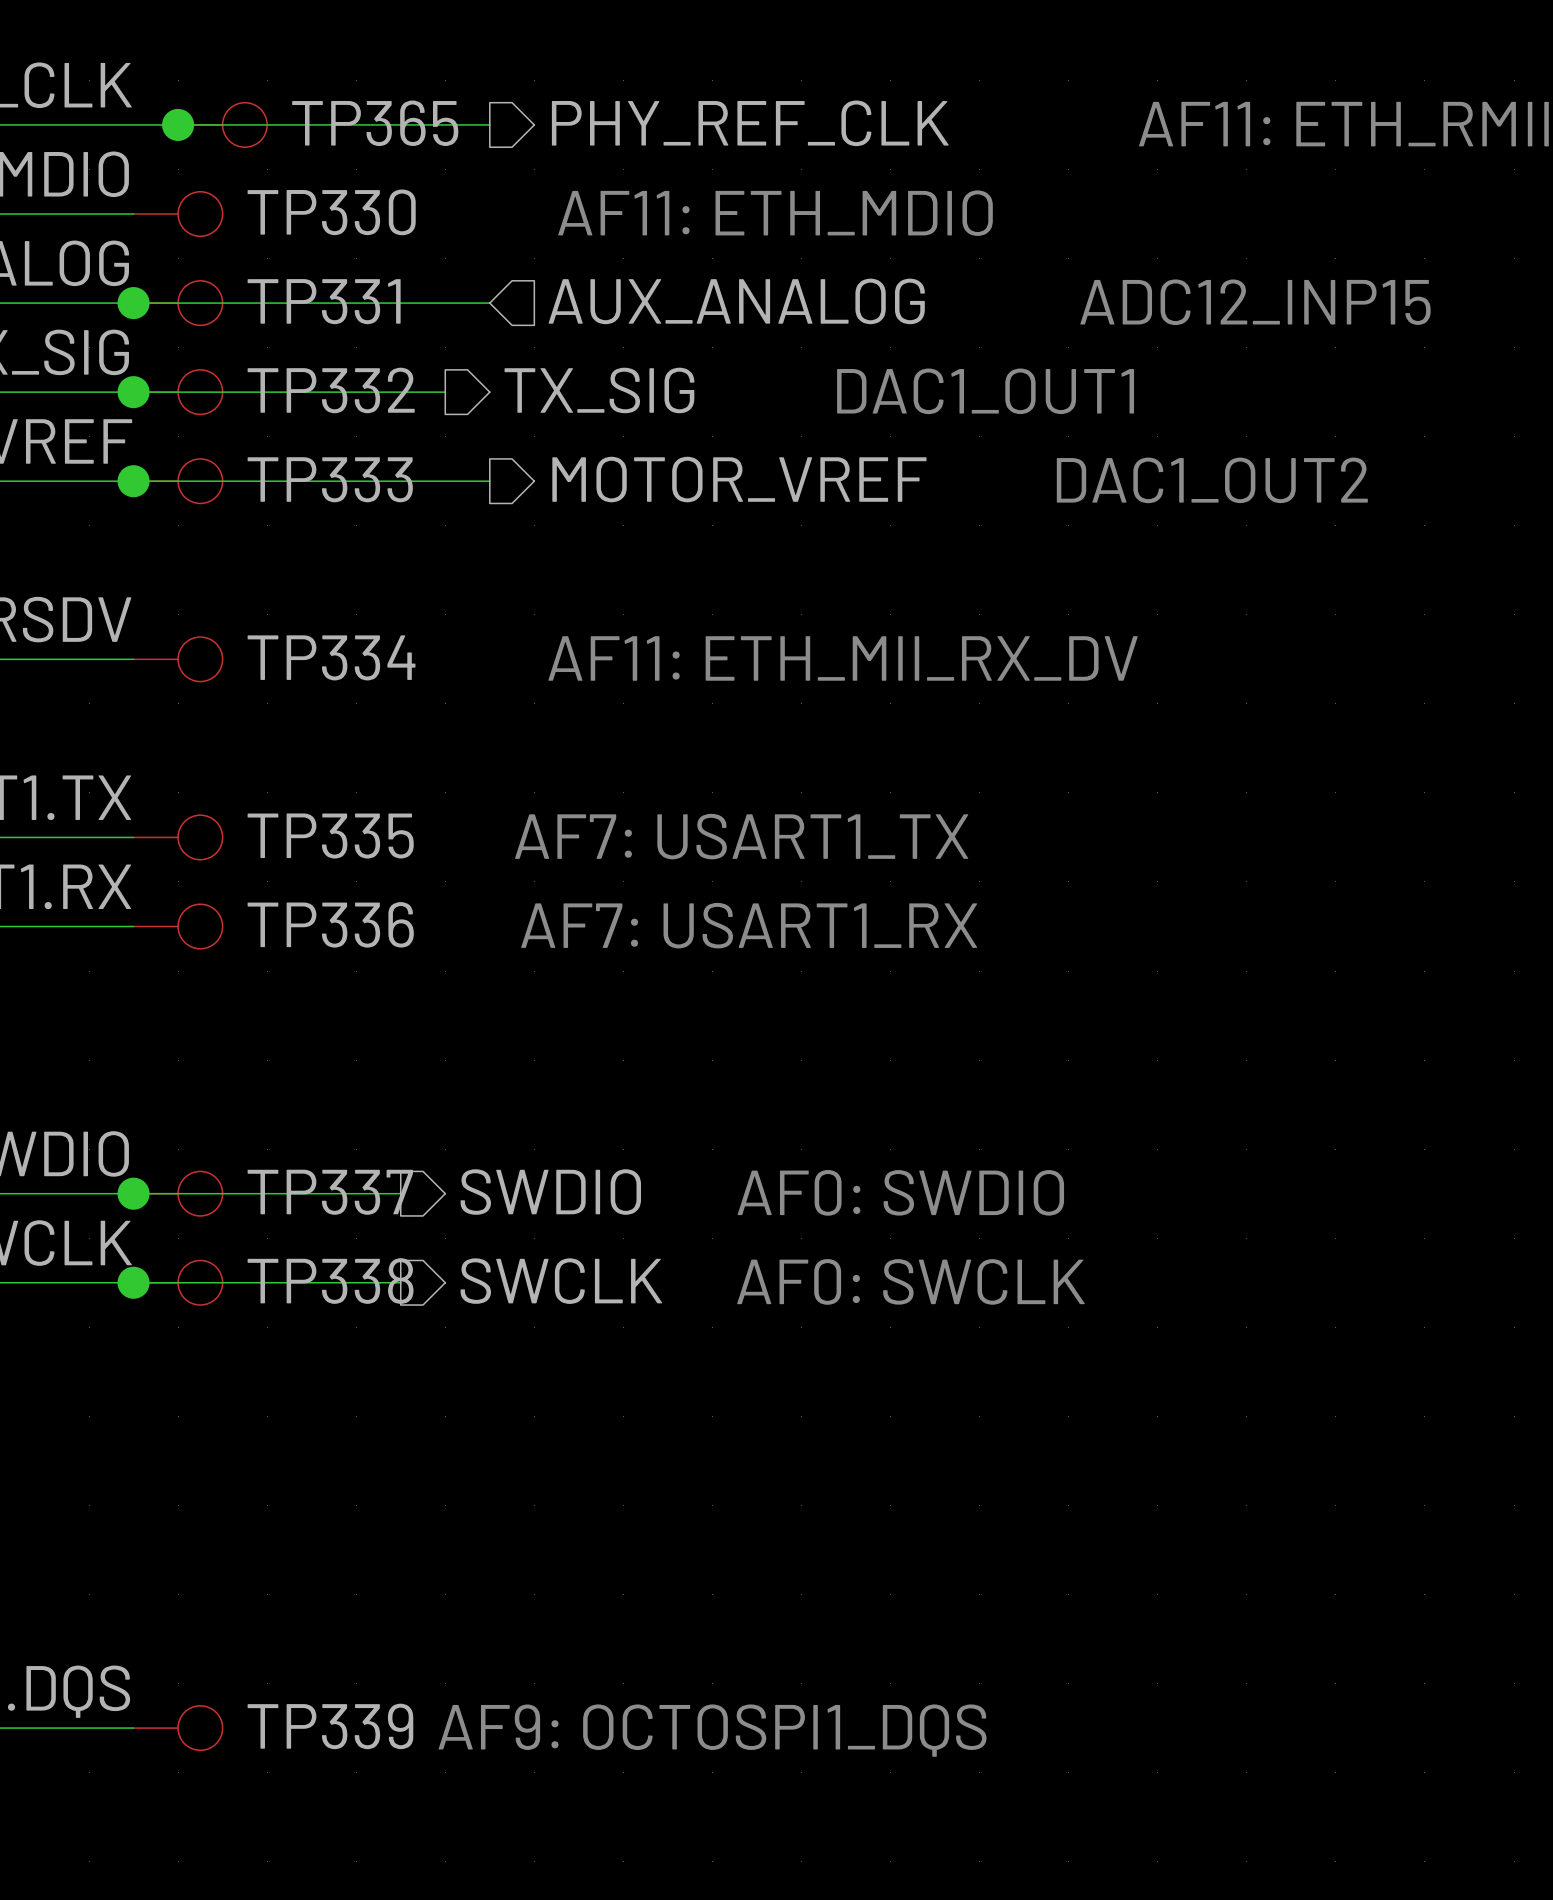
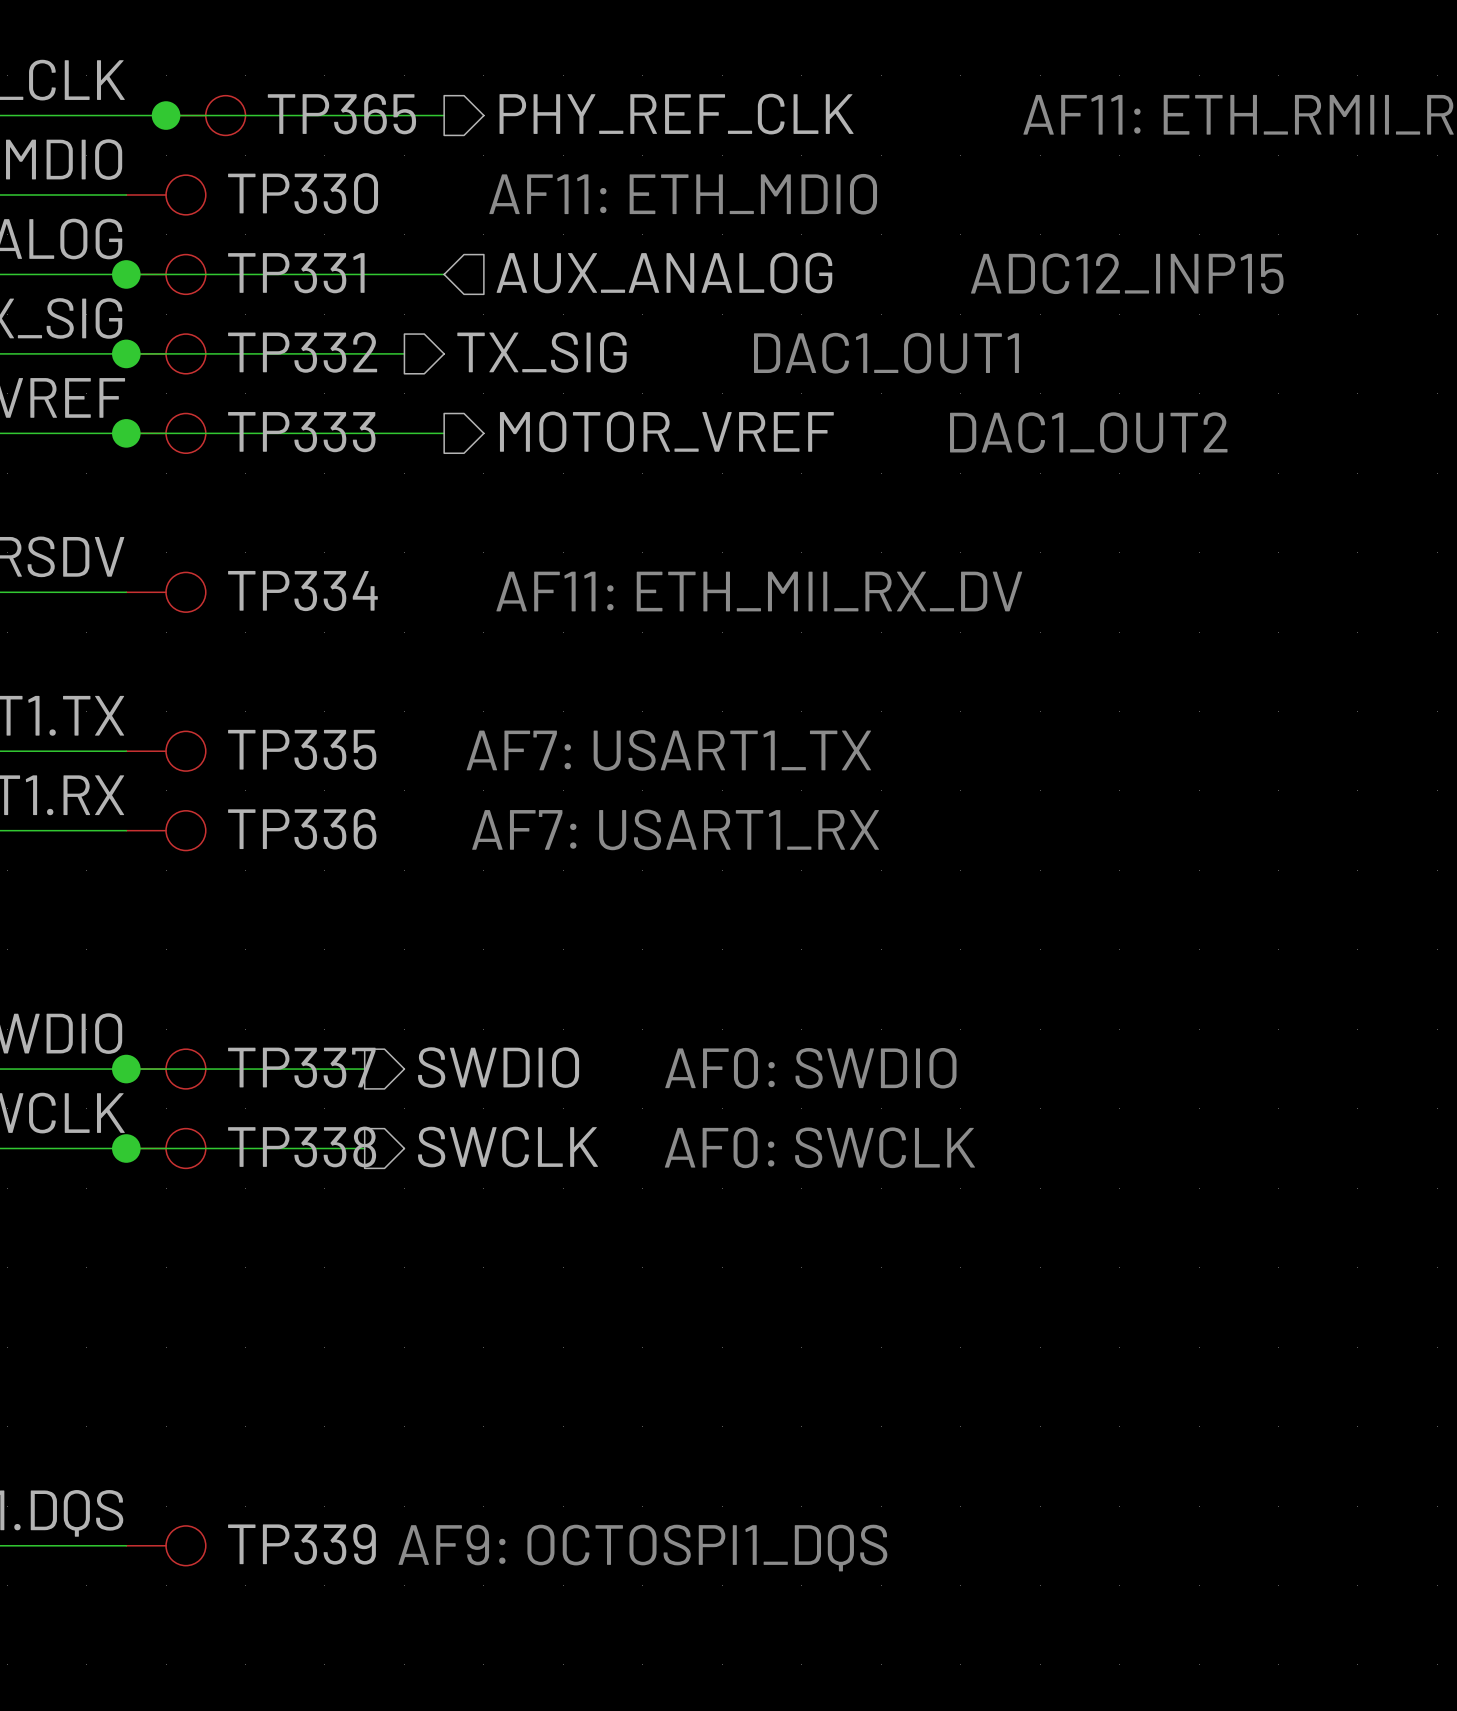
text position: AF11: ETH_MDIO (775, 213) -> AF11: ETH_MDIO (683, 194)

